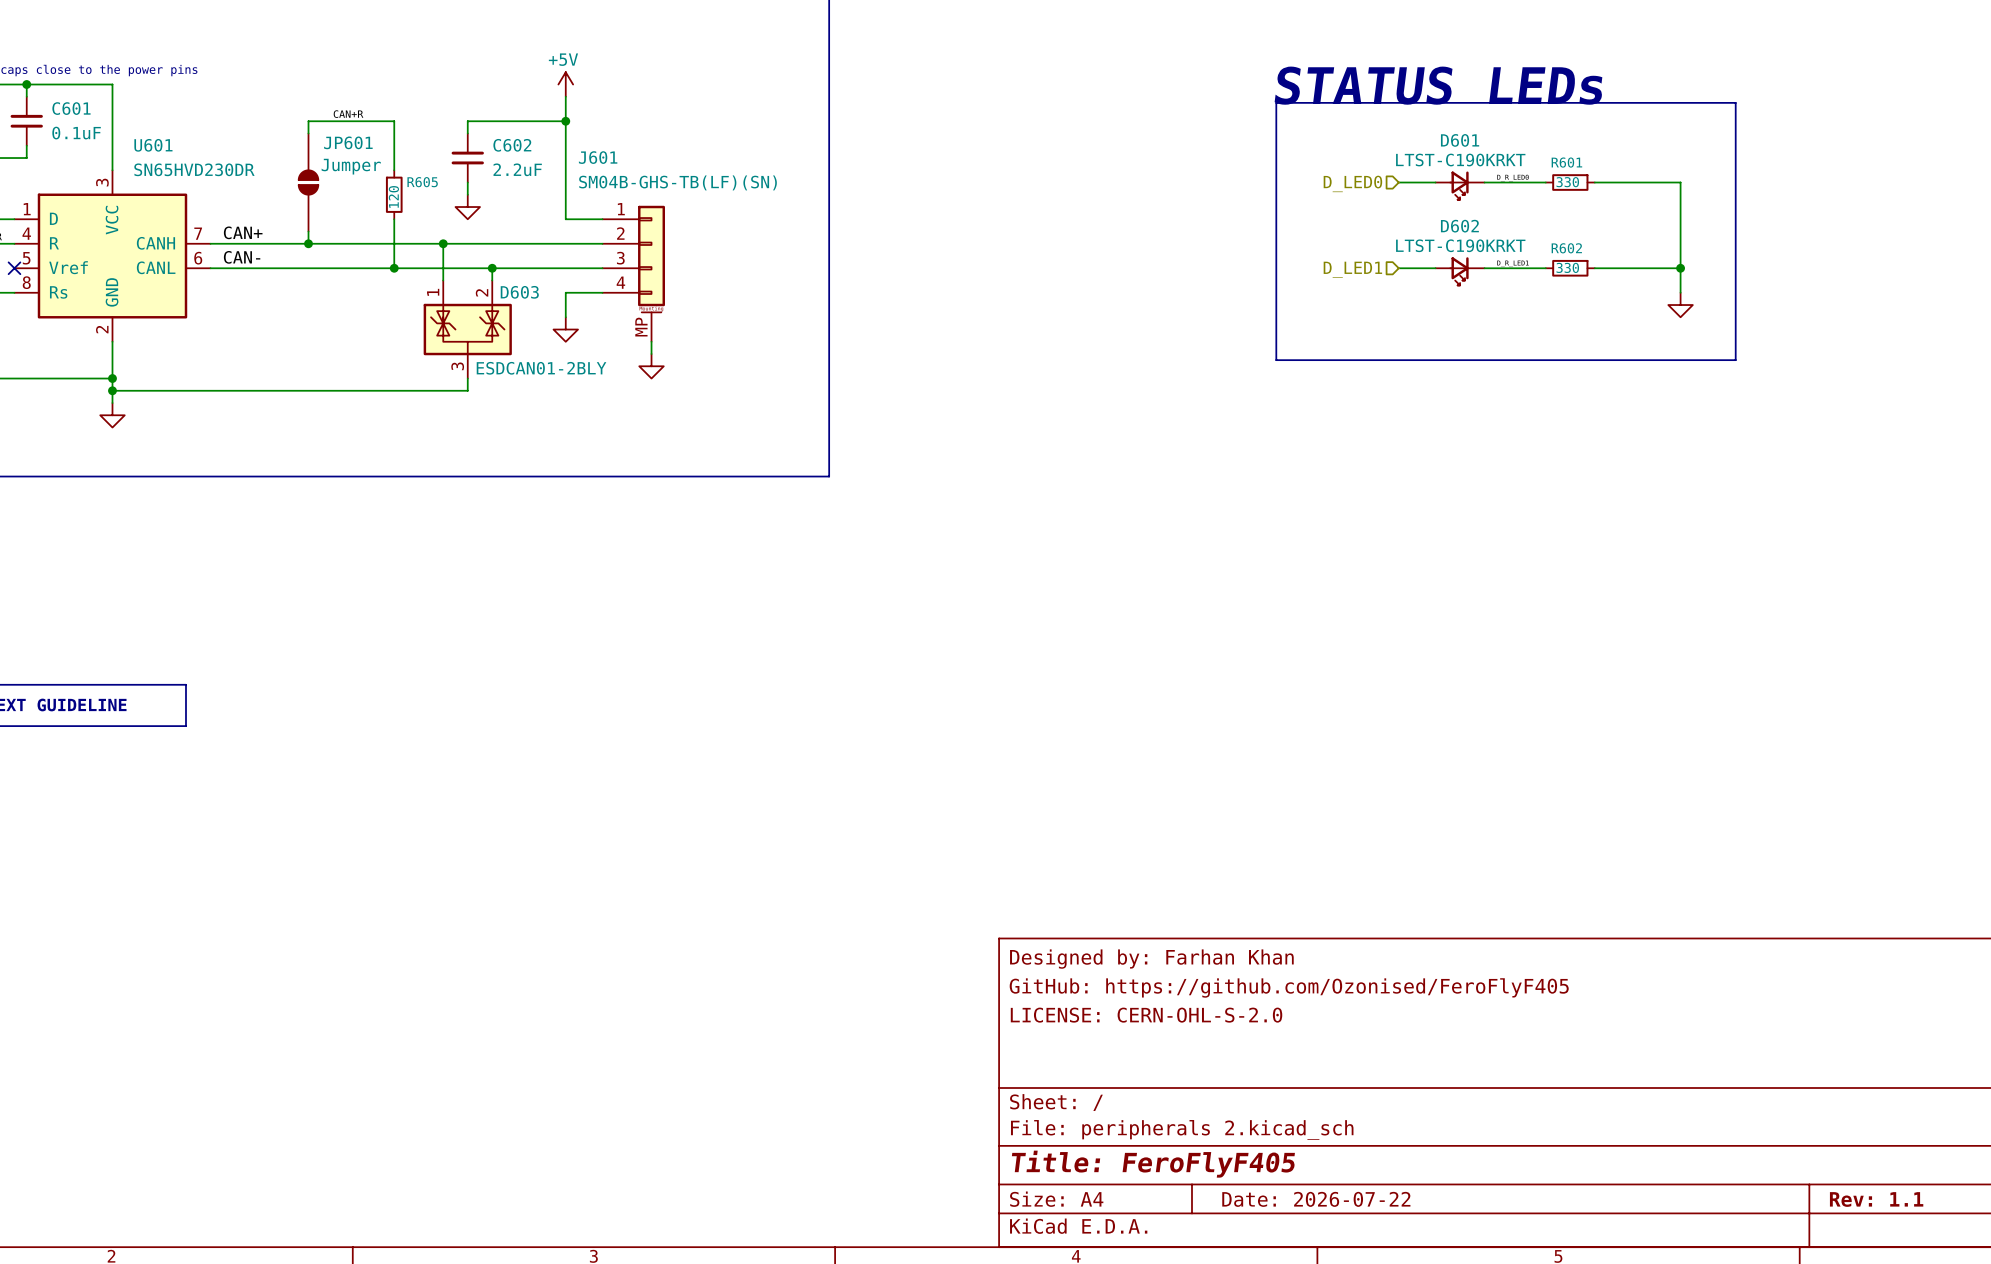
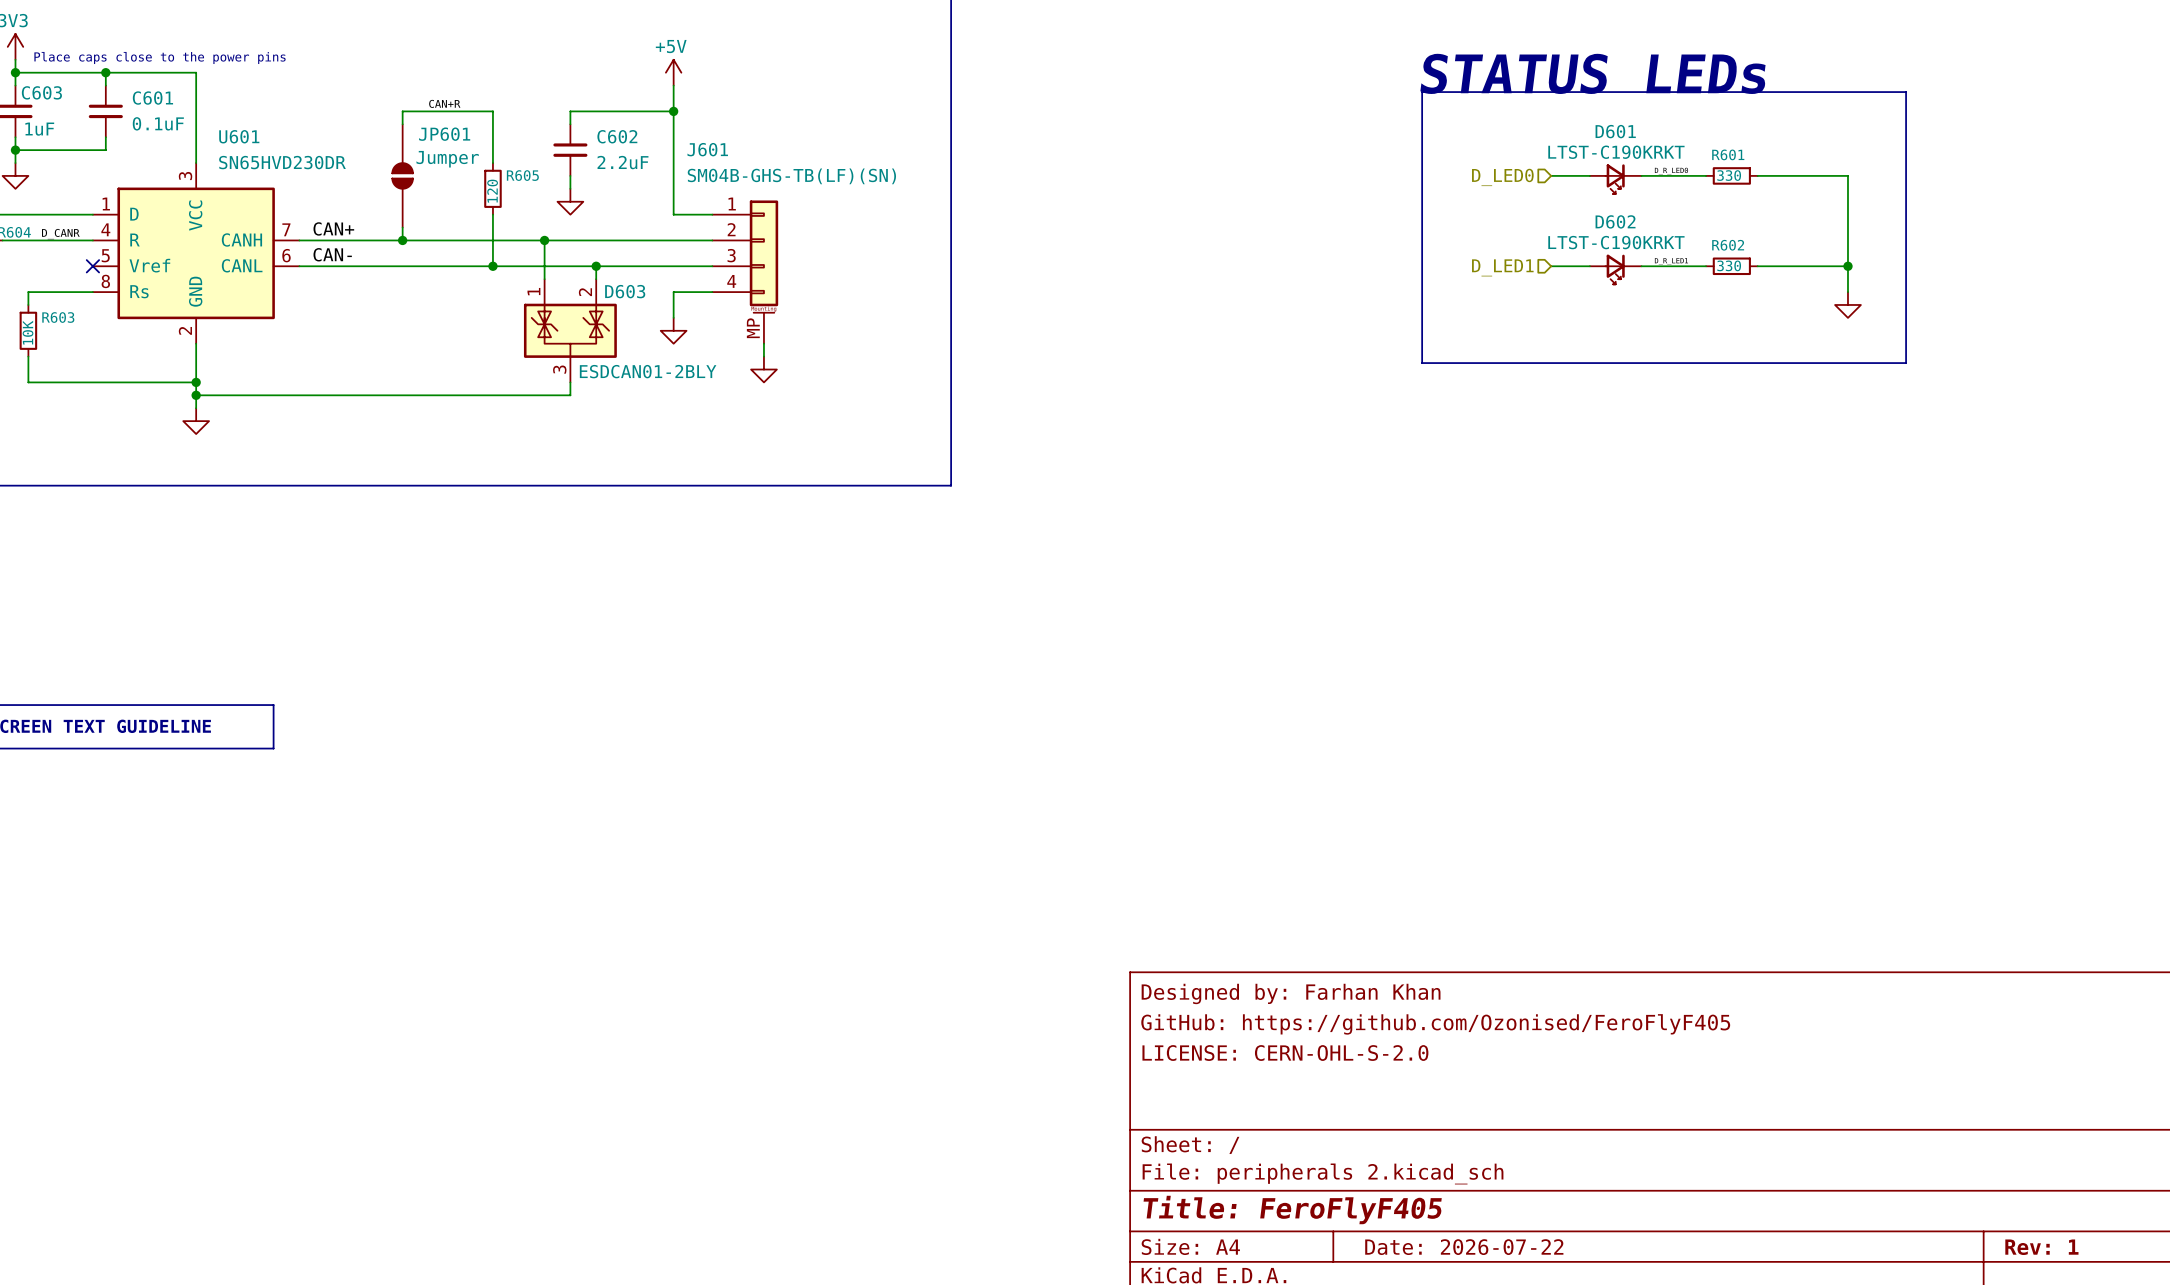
title block: Rev: 1.1 (1876, 1199) -> Rev: 1 (2041, 1247)

